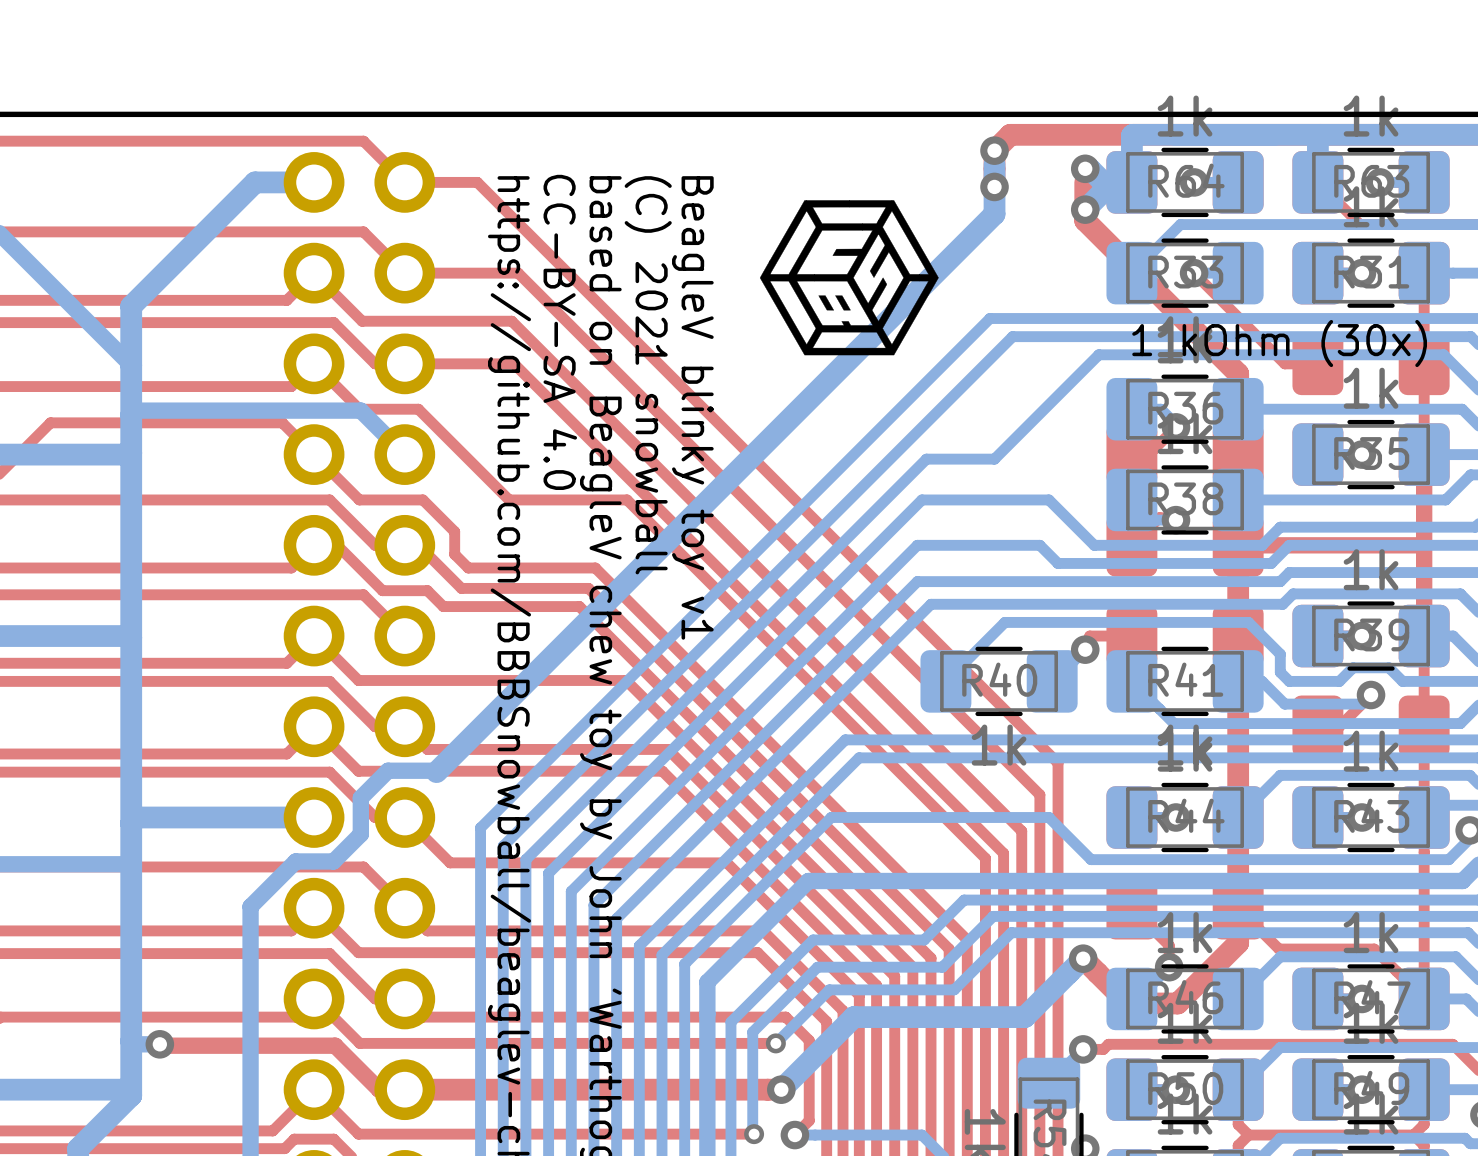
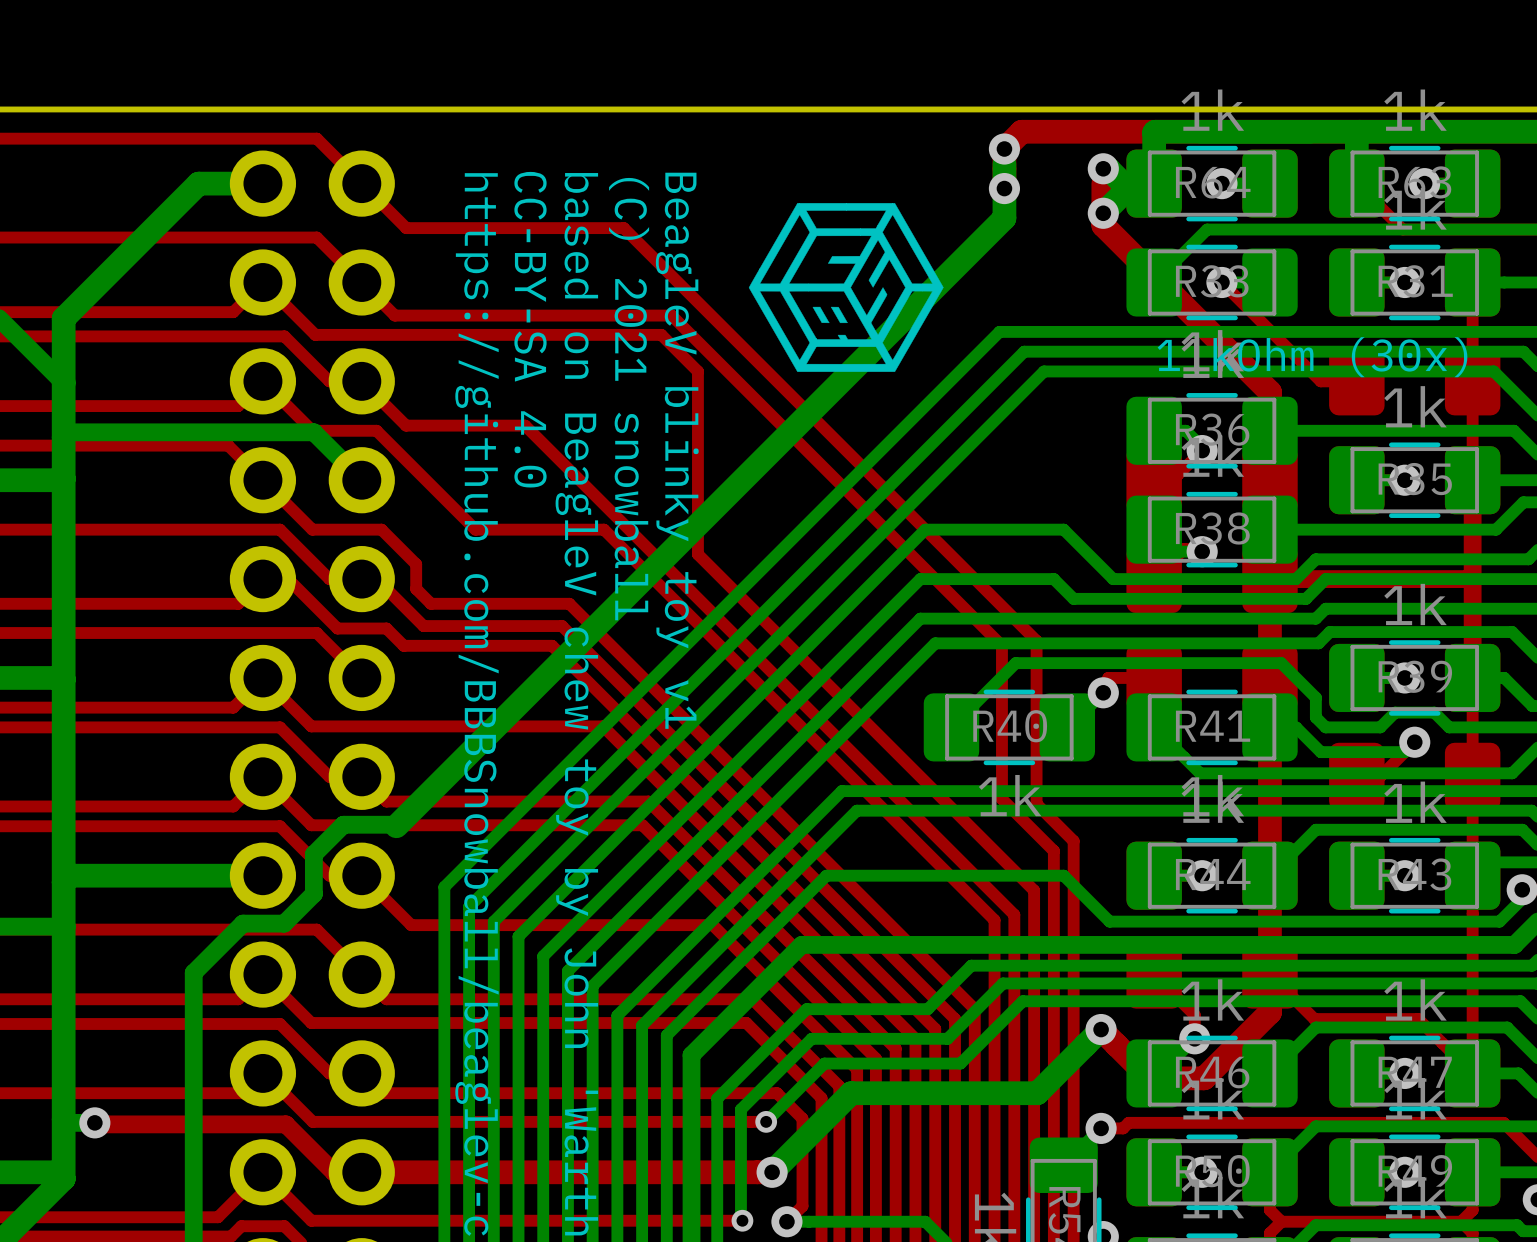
top track: (404, 182) (477, 182) (1058, 763) (1058, 785) -> (361, 183) (406, 228) (623, 228) (1036, 640) (1036, 804) (1073, 841)
top track: (404, 273) (518, 273) (992, 747) -> (361, 282) (394, 315) (671, 315) (1001, 645) (1001, 799)
top track: (511, 321) (713, 522) -> (478, 334) (661, 334) (697, 371) (697, 554)
bottom track: (1098, 354) (994, 459) (926, 459) -> (1118, 371) (1043, 371) (930, 485)
top track: (404, 363) (514, 363) (554, 404) -> (361, 381) (406, 425) (525, 425)

